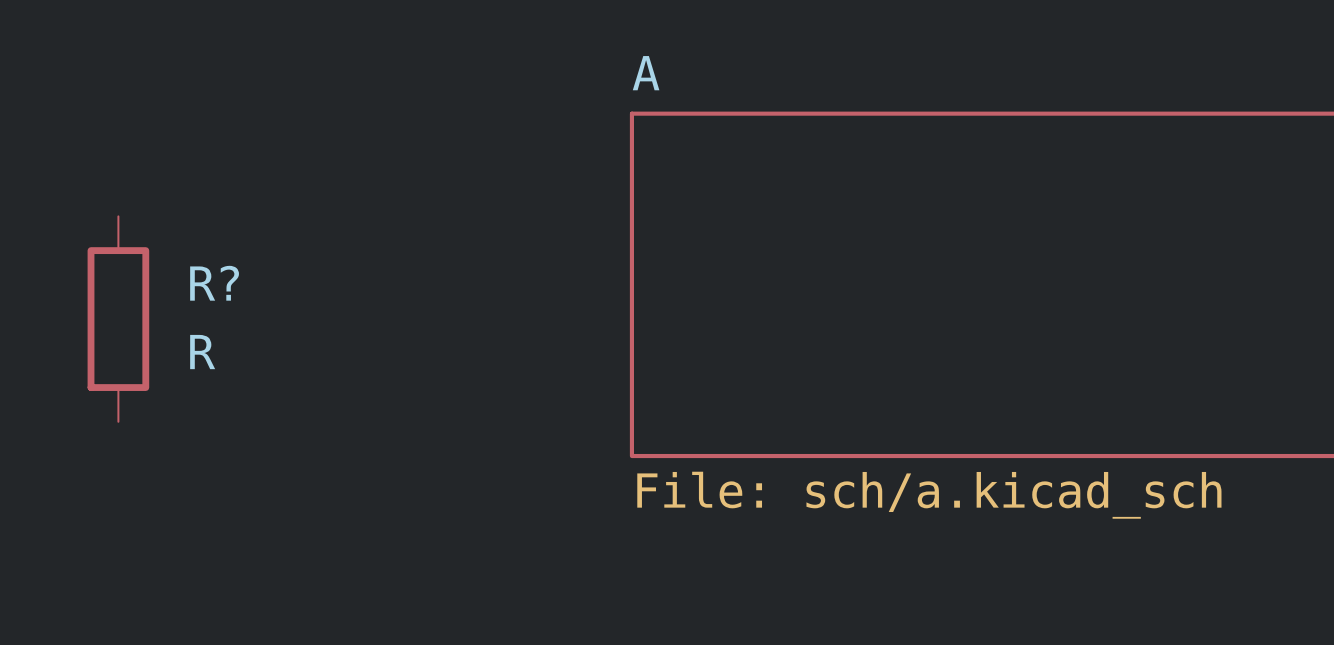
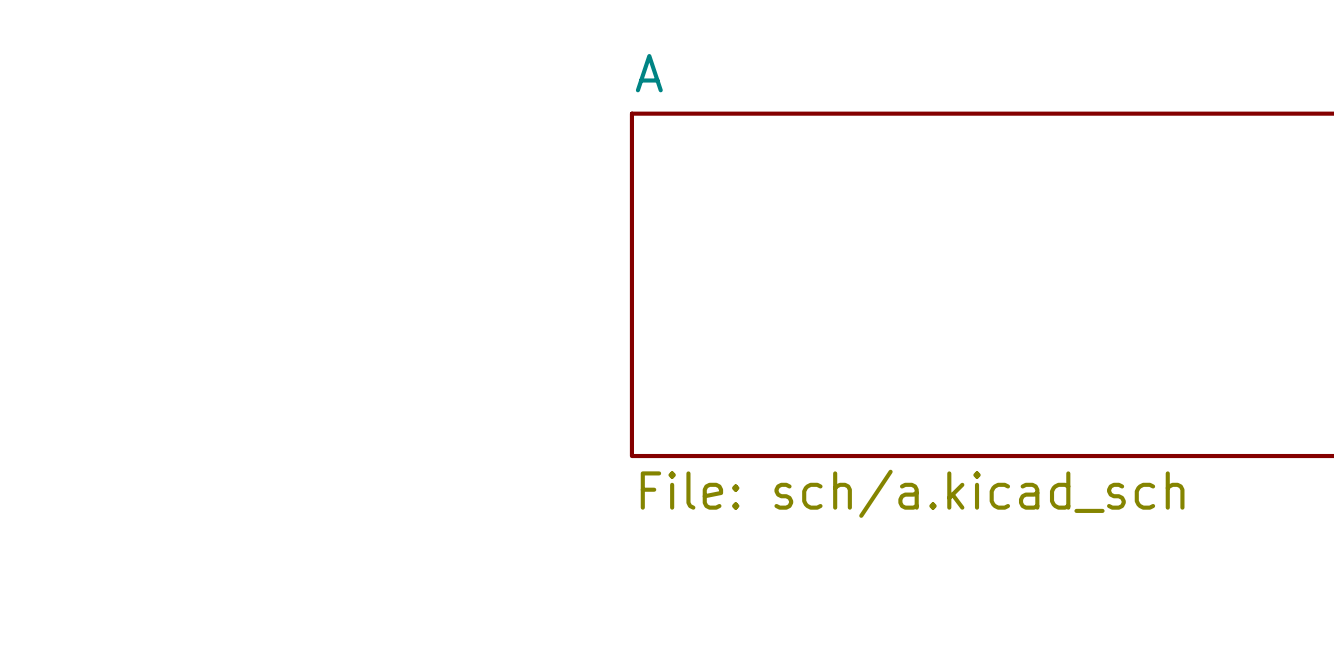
R?: R (118, 319) -> none

